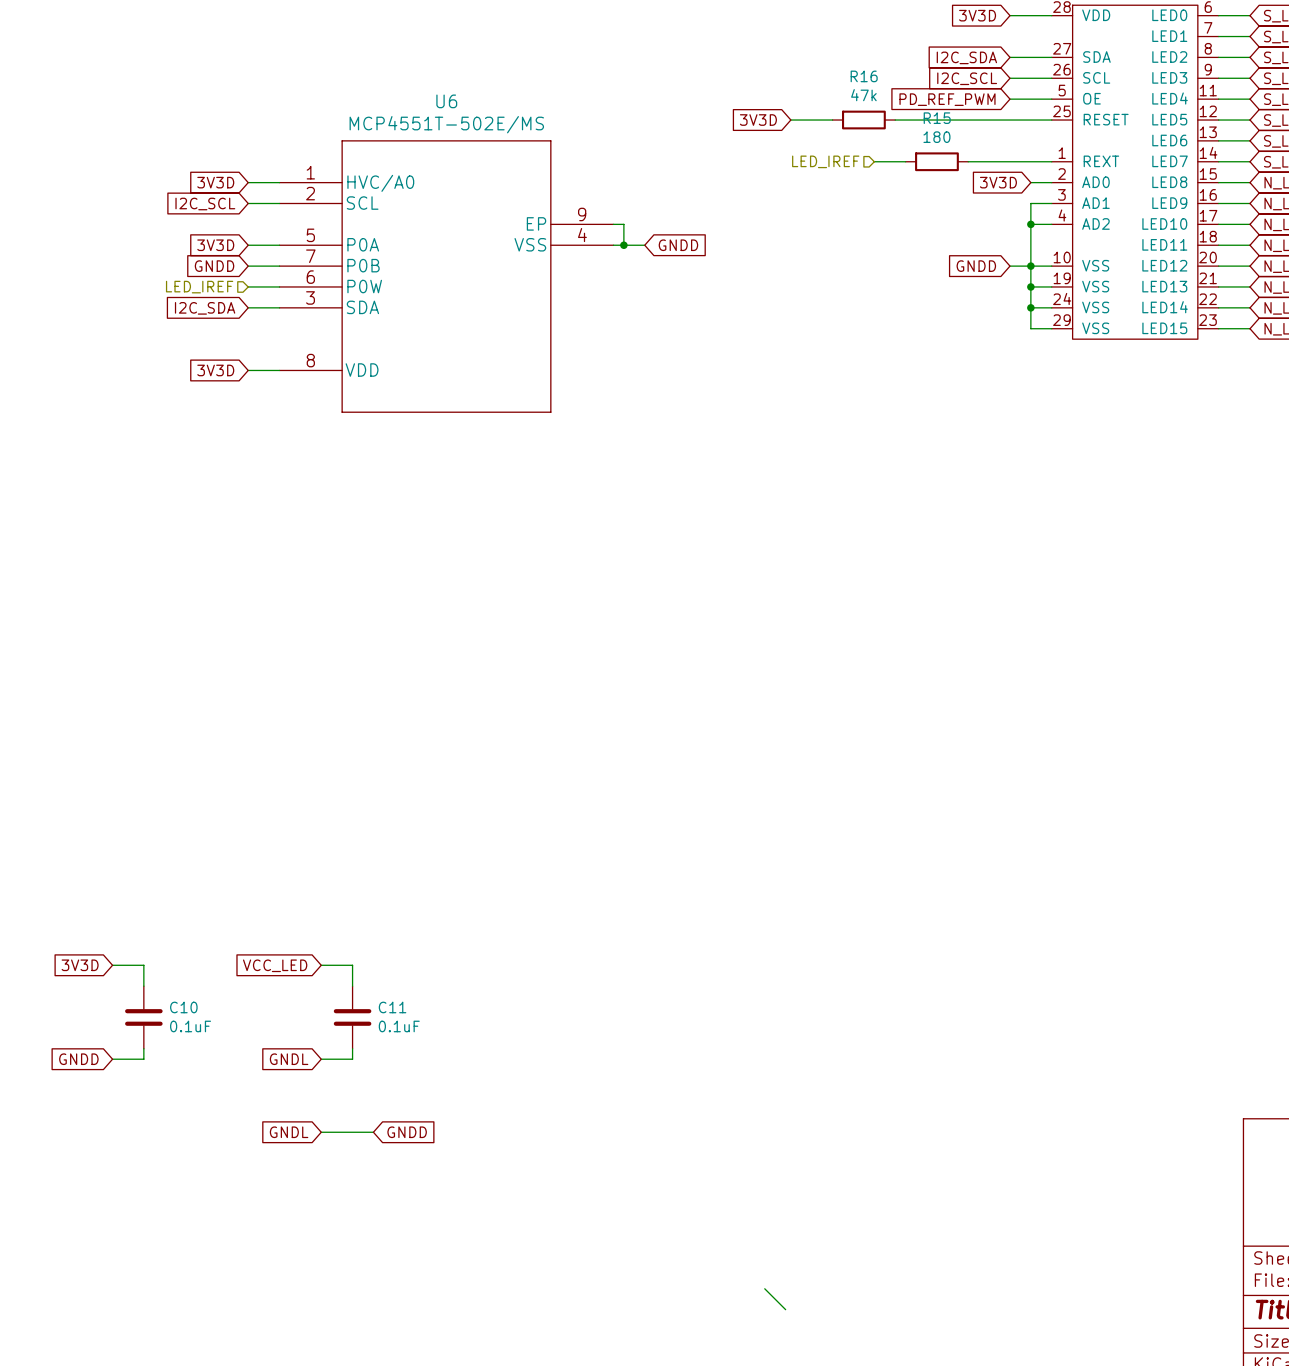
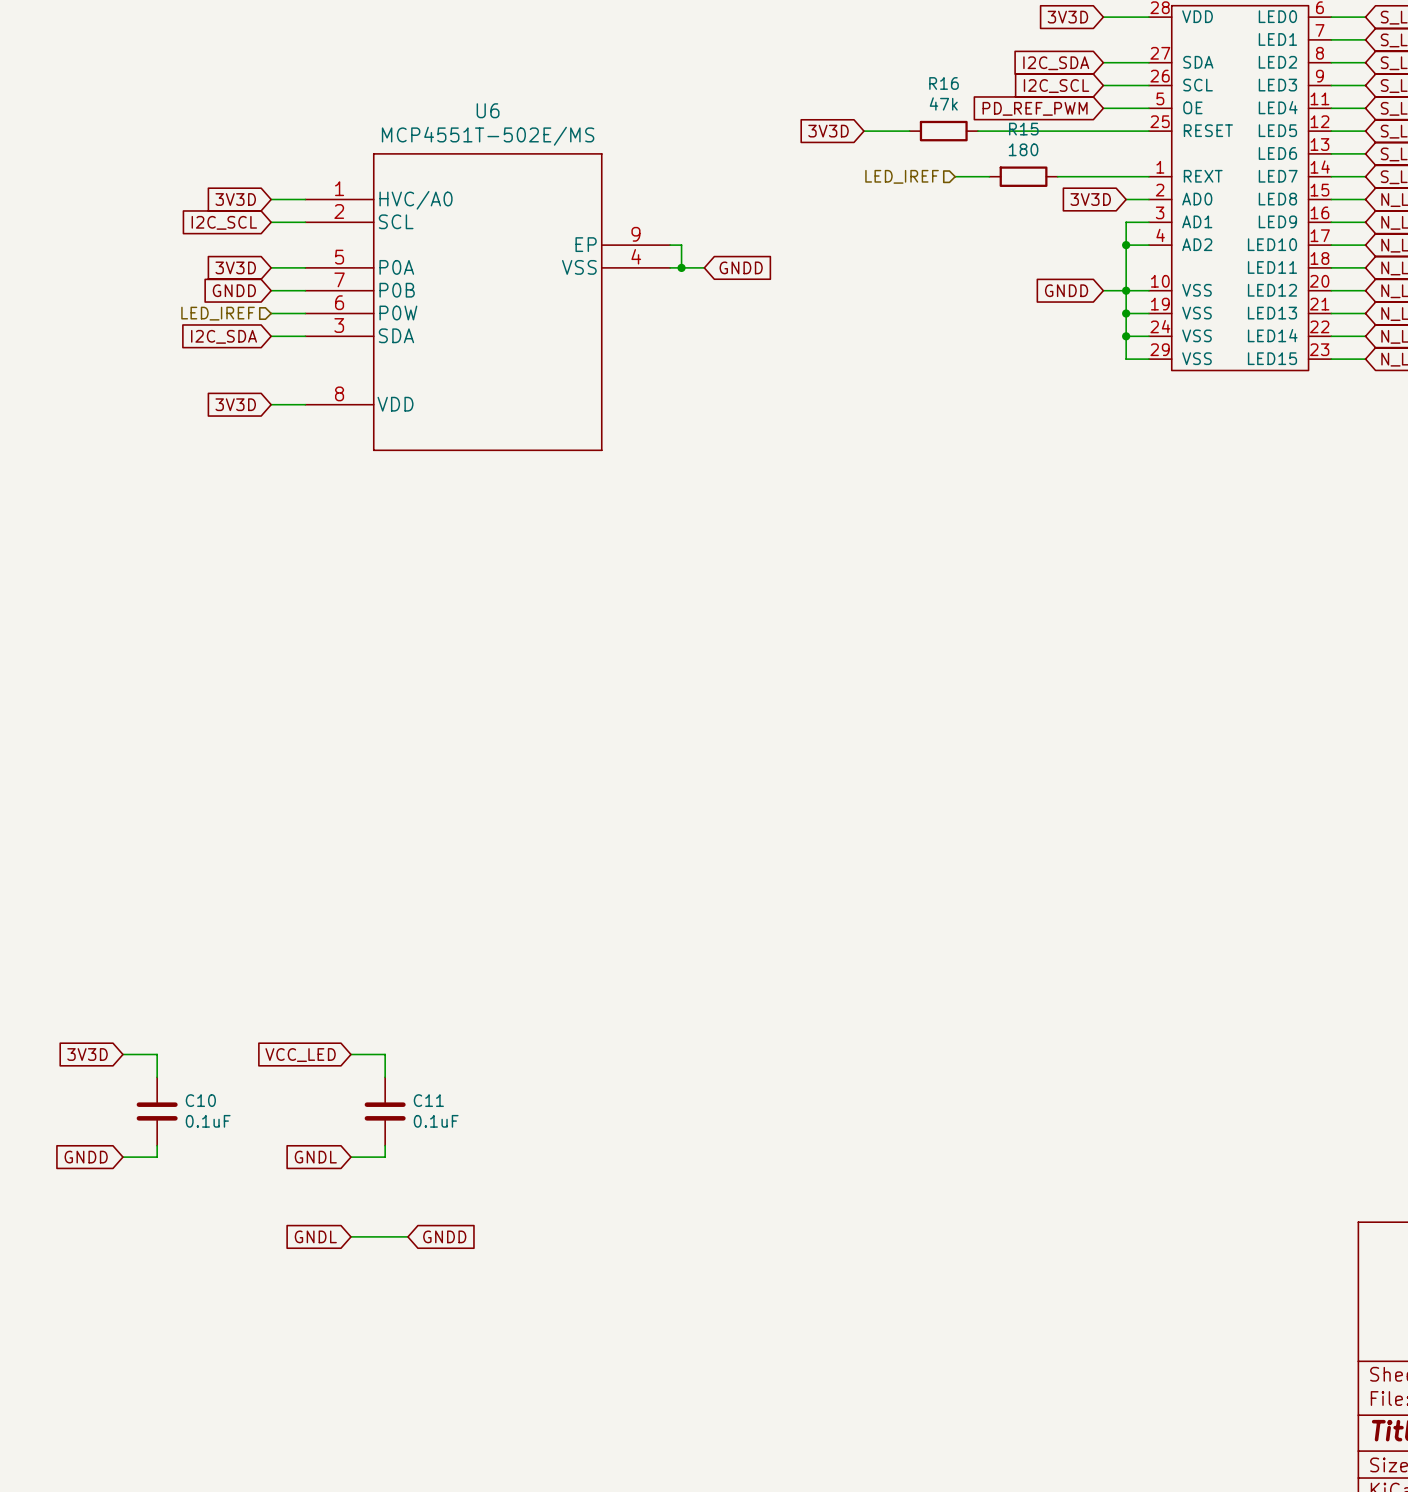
wire: (764, 1288) (785, 1309) -> none

